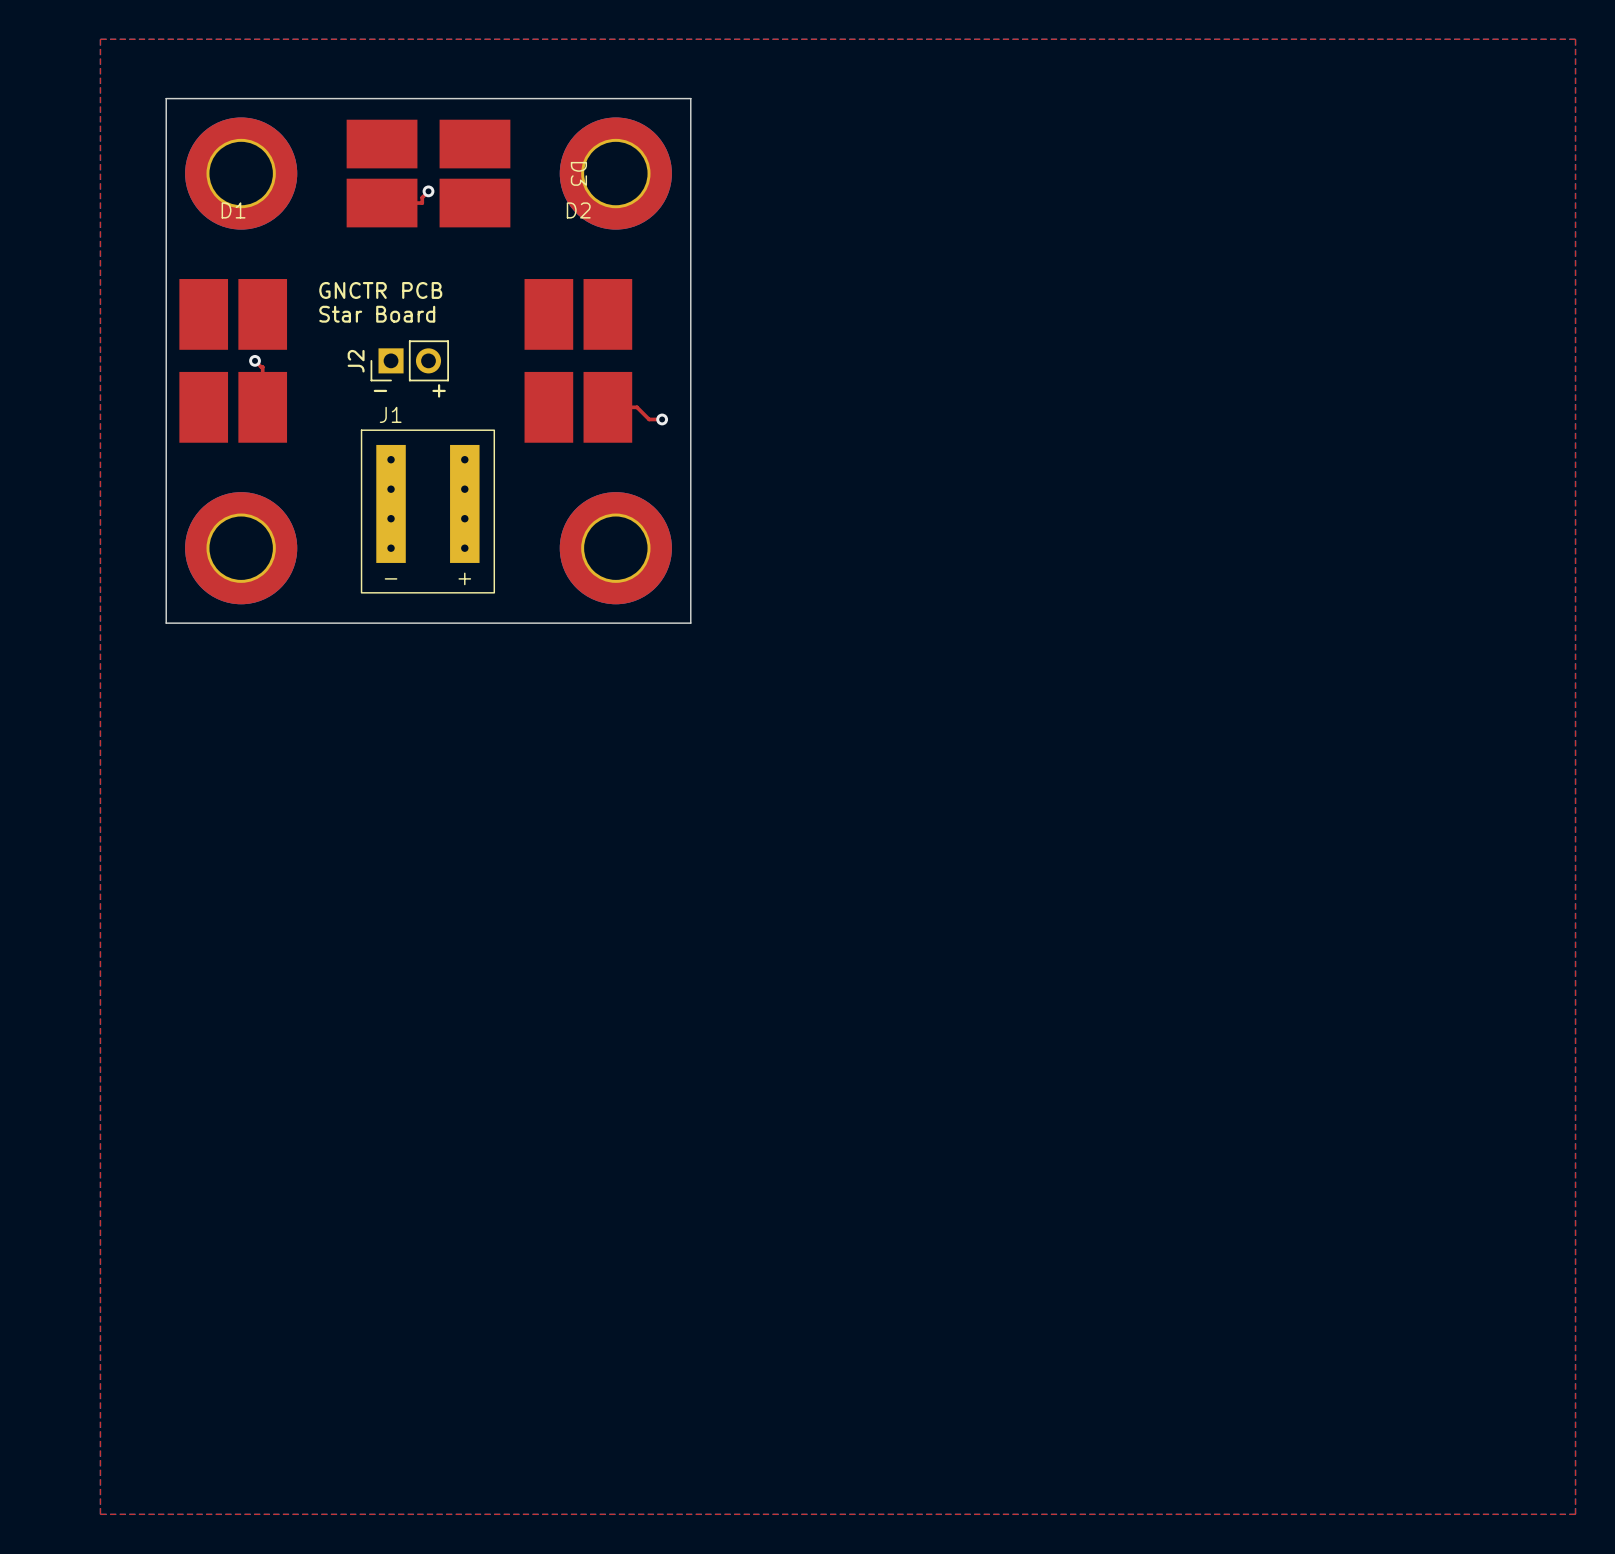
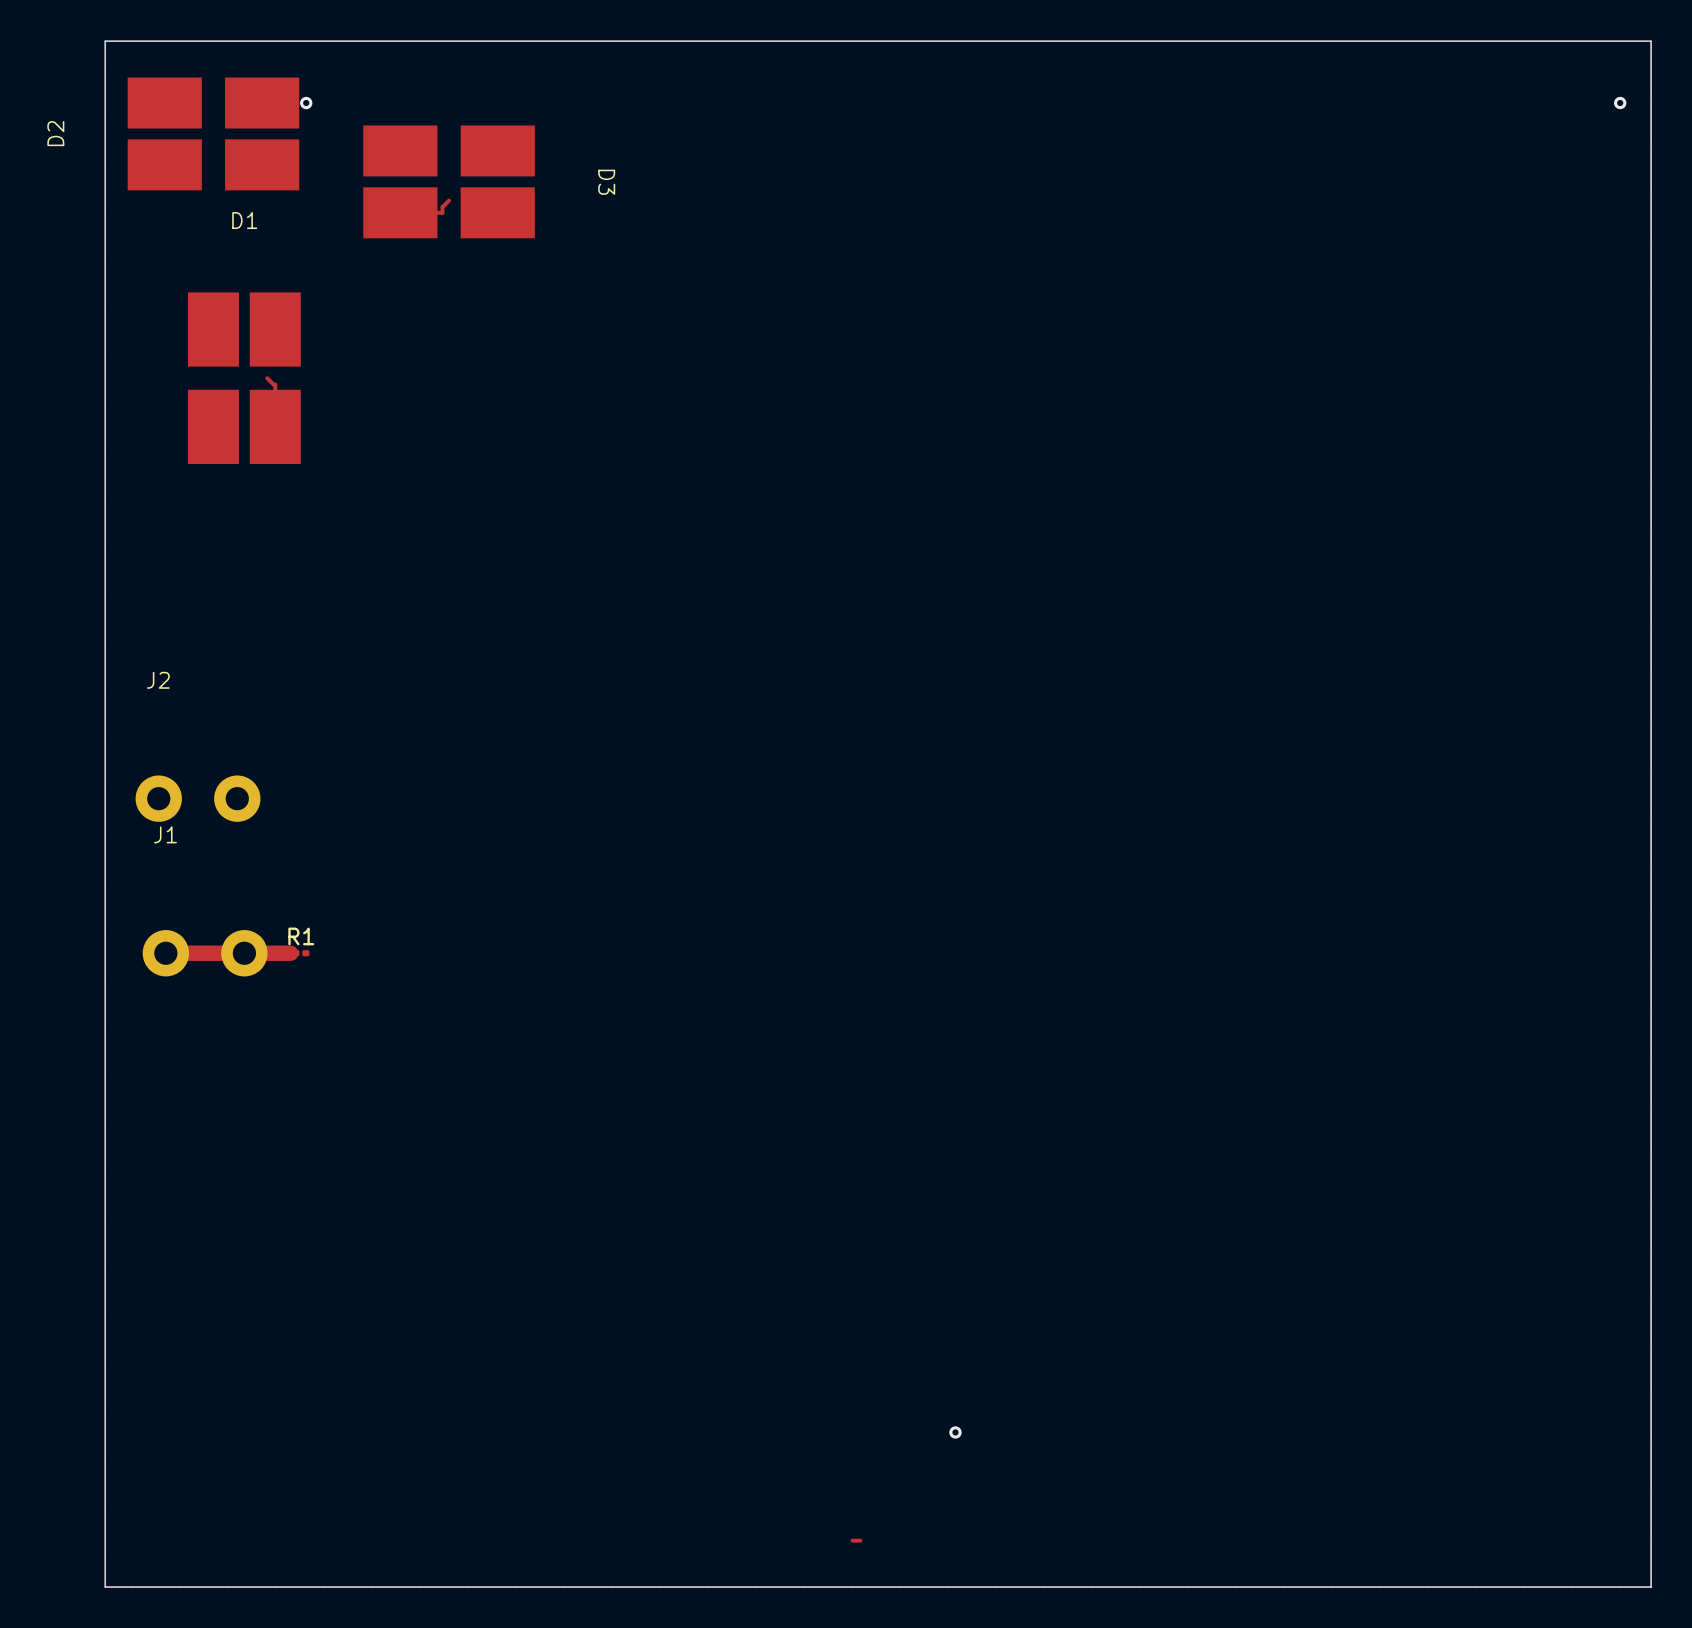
board edge: none -> (105, 41) (1651, 41) (1651, 1587) (105, 1587) (105, 41)
board edge: (166, 98) (690, 98) (690, 623) (166, 623) (166, 98) -> none
via: none -> (306, 103)
via: none -> (1620, 103)
part: (241, 173) -> none
part: (615, 173) -> none
via: (428, 191) -> none
D2 name position: D2 (578, 210) -> D2 (55, 133)
text: GNCTR PCB (380, 290) -> none
text: Star Board (377, 314) -> none
J2 footprint: [370, 340, 450, 382] -> [135, 775, 261, 822]
via: (255, 360) -> none
D2 rotation: 0° (578, 360) -> 90° clockwise (213, 133)
D2 position: (578, 360) -> (213, 133)
J2 name position: J2 (356, 361) -> J2 (158, 680)
text: - (380, 390) -> none
text: + (439, 390) -> none
top track: (607, 407) (637, 407) (649, 419) (662, 419) -> none
via: (662, 419) -> none
J1 footprint: [360, 429, 496, 594] -> [142, 930, 268, 977]
part: (241, 548) -> none
part: (615, 548) -> none
top track: none -> (165, 953) (290, 953)
R1: none -> (300, 953)
via: none -> (955, 1432)
top track: none -> (852, 1540) (860, 1540)

